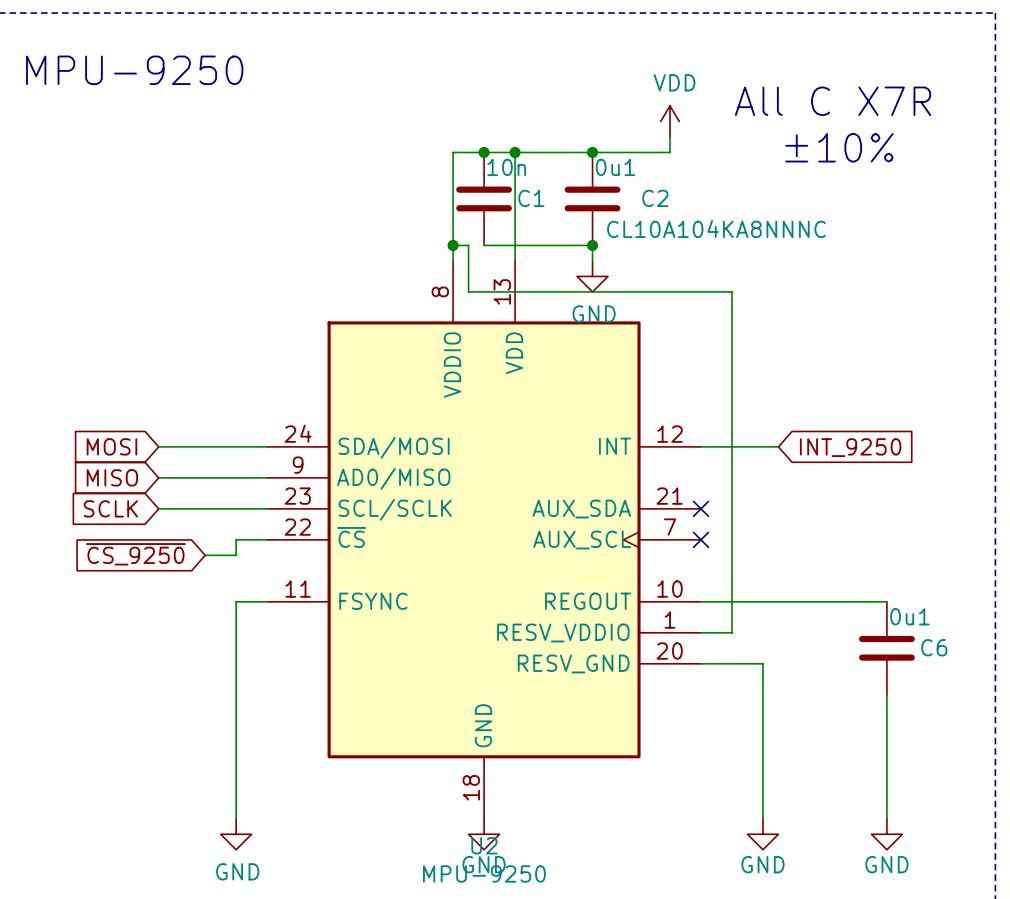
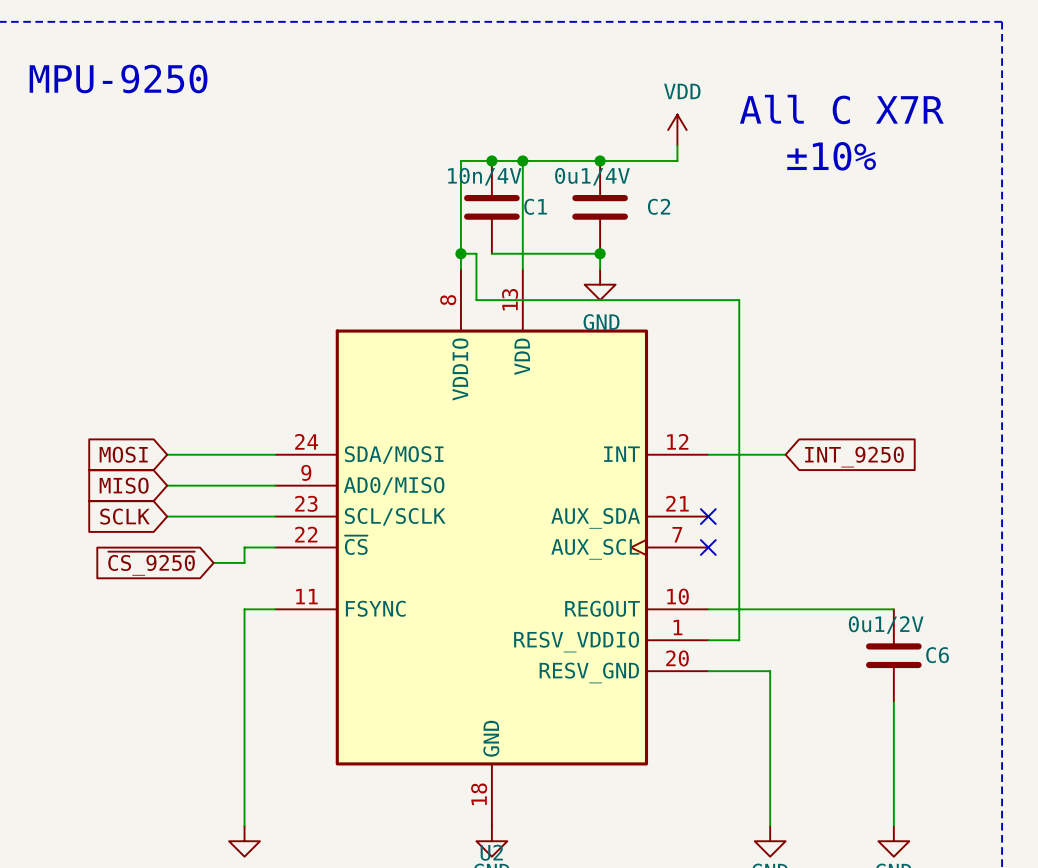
C1 value: 10n (506, 167) -> 10n/4V (484, 176)
C2 value: 0u1 (615, 167) -> 0u1/4V (592, 176)
C2 text: CL10A104KA8NNNC (716, 229) -> none
C6 value: 0u1 (909, 616) -> 0u1/2V (886, 625)

